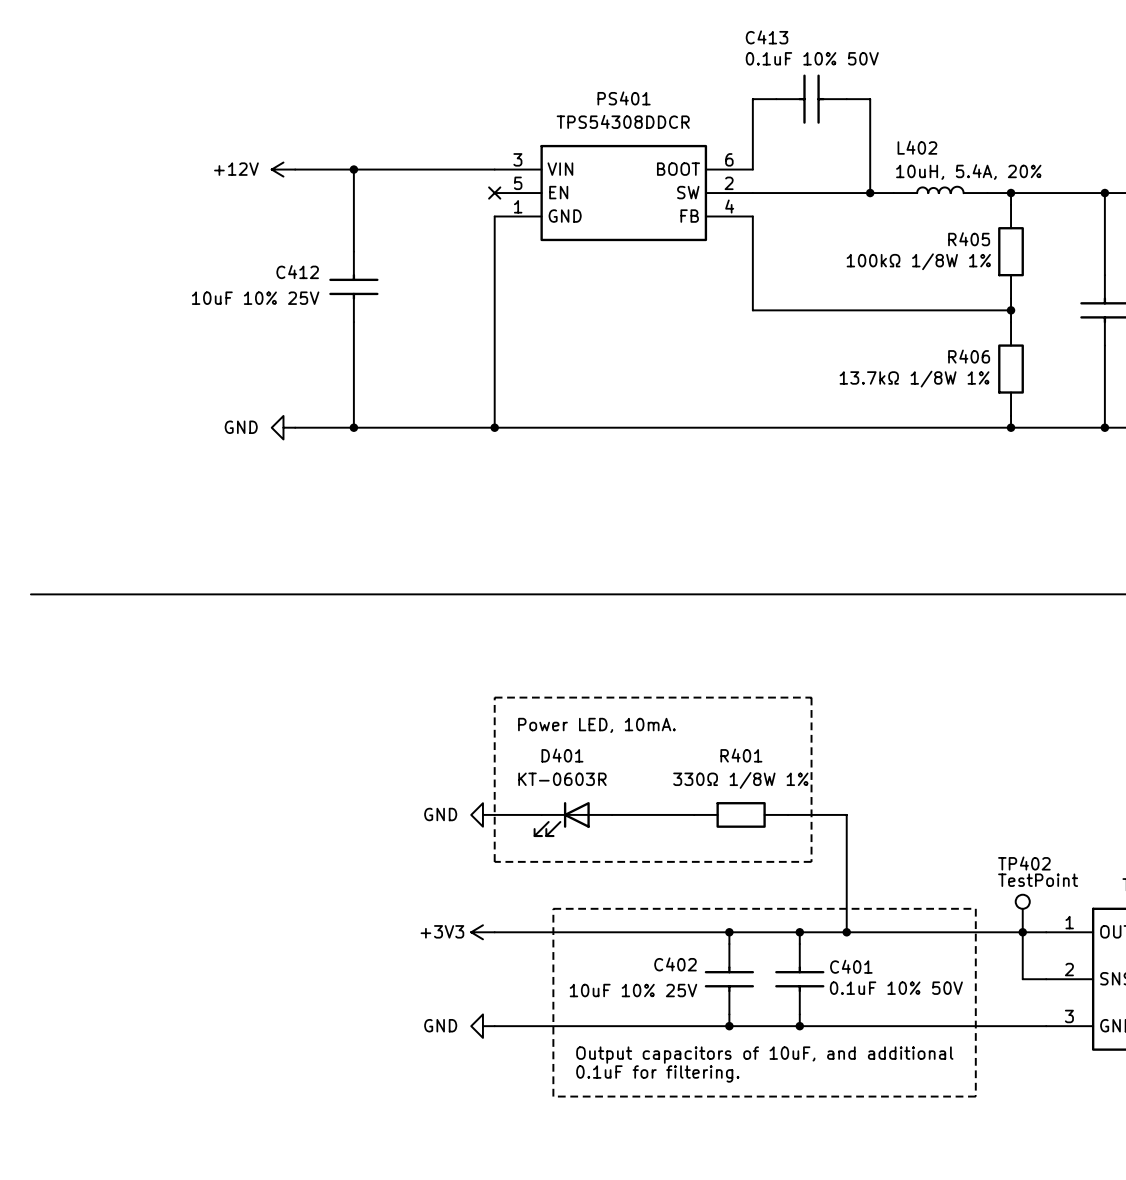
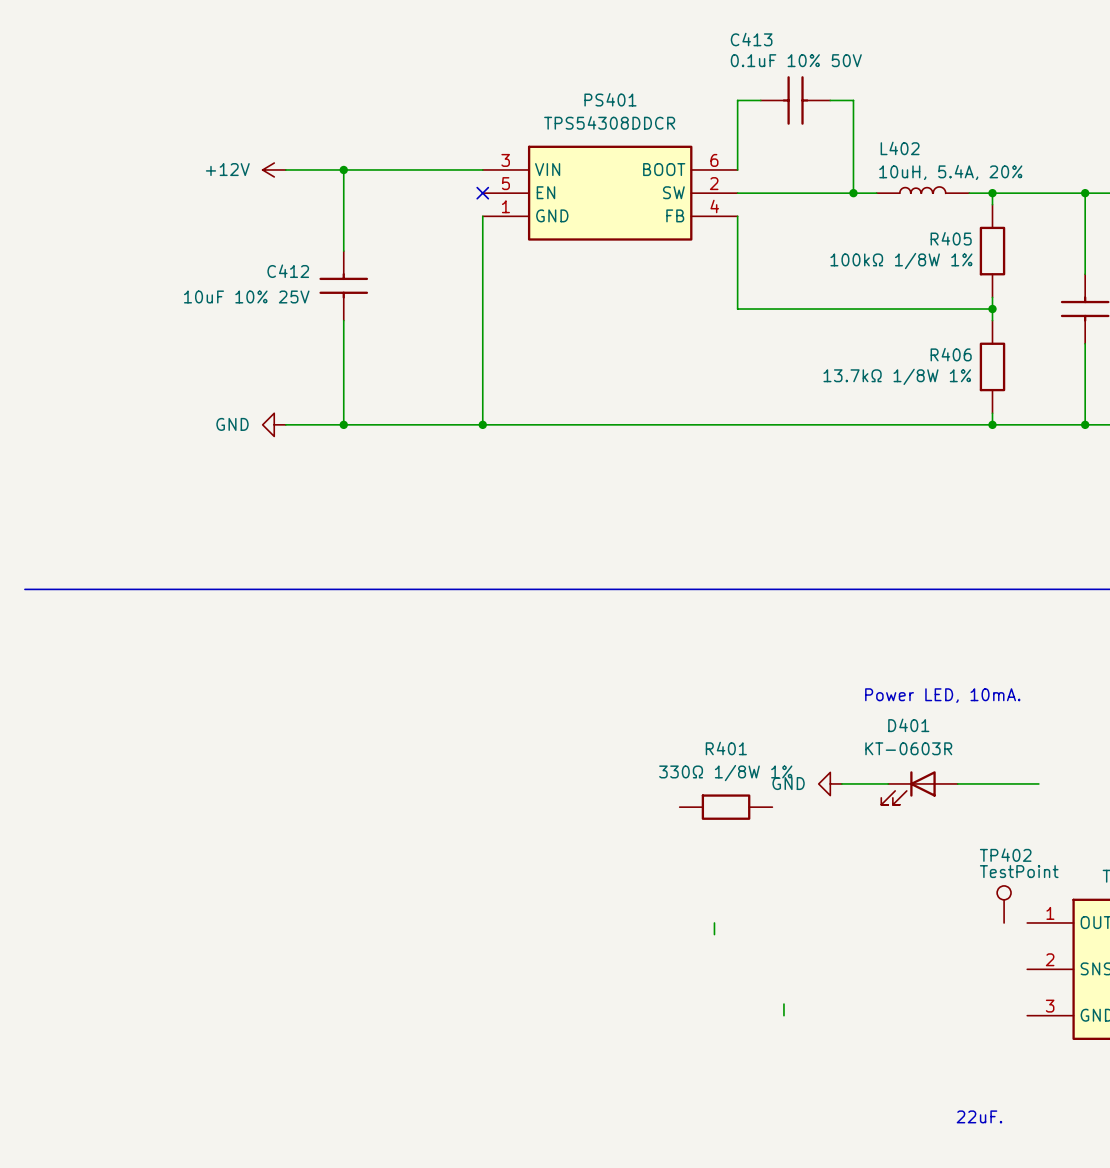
line: (494, 697) (811, 697) (811, 861) (494, 861) (494, 697) -> none
text: none -> Power LED, 10mA. (942, 695)
text: Power LED, 10mA. (596, 725) -> none
power symbol: none -> GND (830, 783)
wire: none -> (841, 783) (888, 783)
wire: none -> (957, 783) (1038, 783)
power symbol: GND (482, 814) -> none
wire: (494, 814) (541, 814) -> none
wire: (612, 814) (694, 814) -> none
wire: (788, 814) (846, 814) (846, 932) -> none
D401 position: (573, 819) -> (919, 788)
line: (553, 908) (975, 908) (975, 1096) (553, 1096) (553, 908) -> none
power symbol: +3V3 (482, 932) -> none
wire: (494, 932) (1046, 932) -> none
junction: (729, 932) -> none
wire: (799, 932) (799, 944) -> none
junction: (799, 932) -> none
junction: (846, 932) -> none
wire: (1022, 932) (1022, 979) (1046, 979) -> none
junction: (1022, 932) -> none
C402: 10uF 10% 25V (729, 979) -> none
C401: 0.1uF 10% 50V (799, 979) -> none
wire: (729, 1014) (729, 1026) -> none
power symbol: GND (482, 1026) -> none
wire: (494, 1026) (1046, 1026) -> none
junction: (729, 1026) -> none
junction: (799, 1026) -> none
text: Output capacitors of 10uF, and additional (764, 1055) -> none
text: 0.1uF for filtering. (657, 1073) -> none
text: none -> 22uF. (979, 1116)

